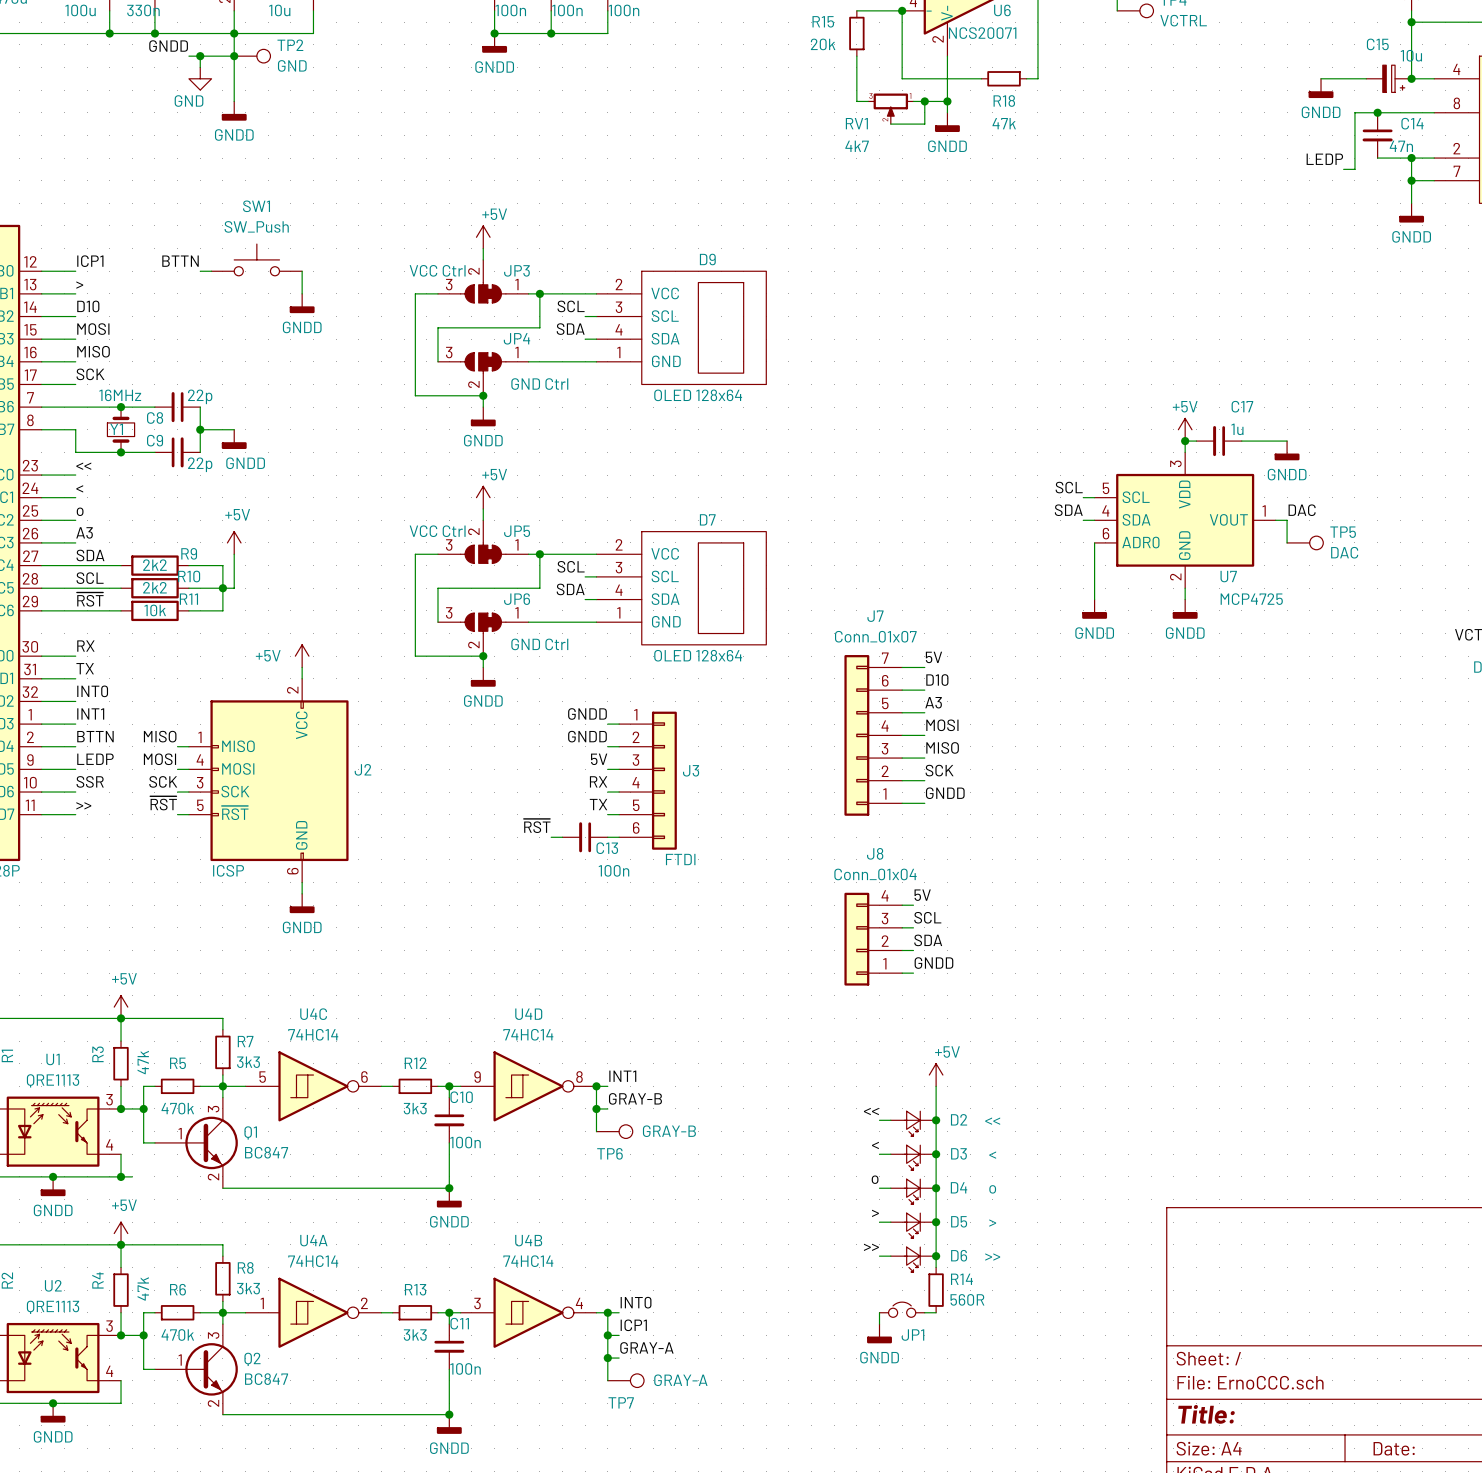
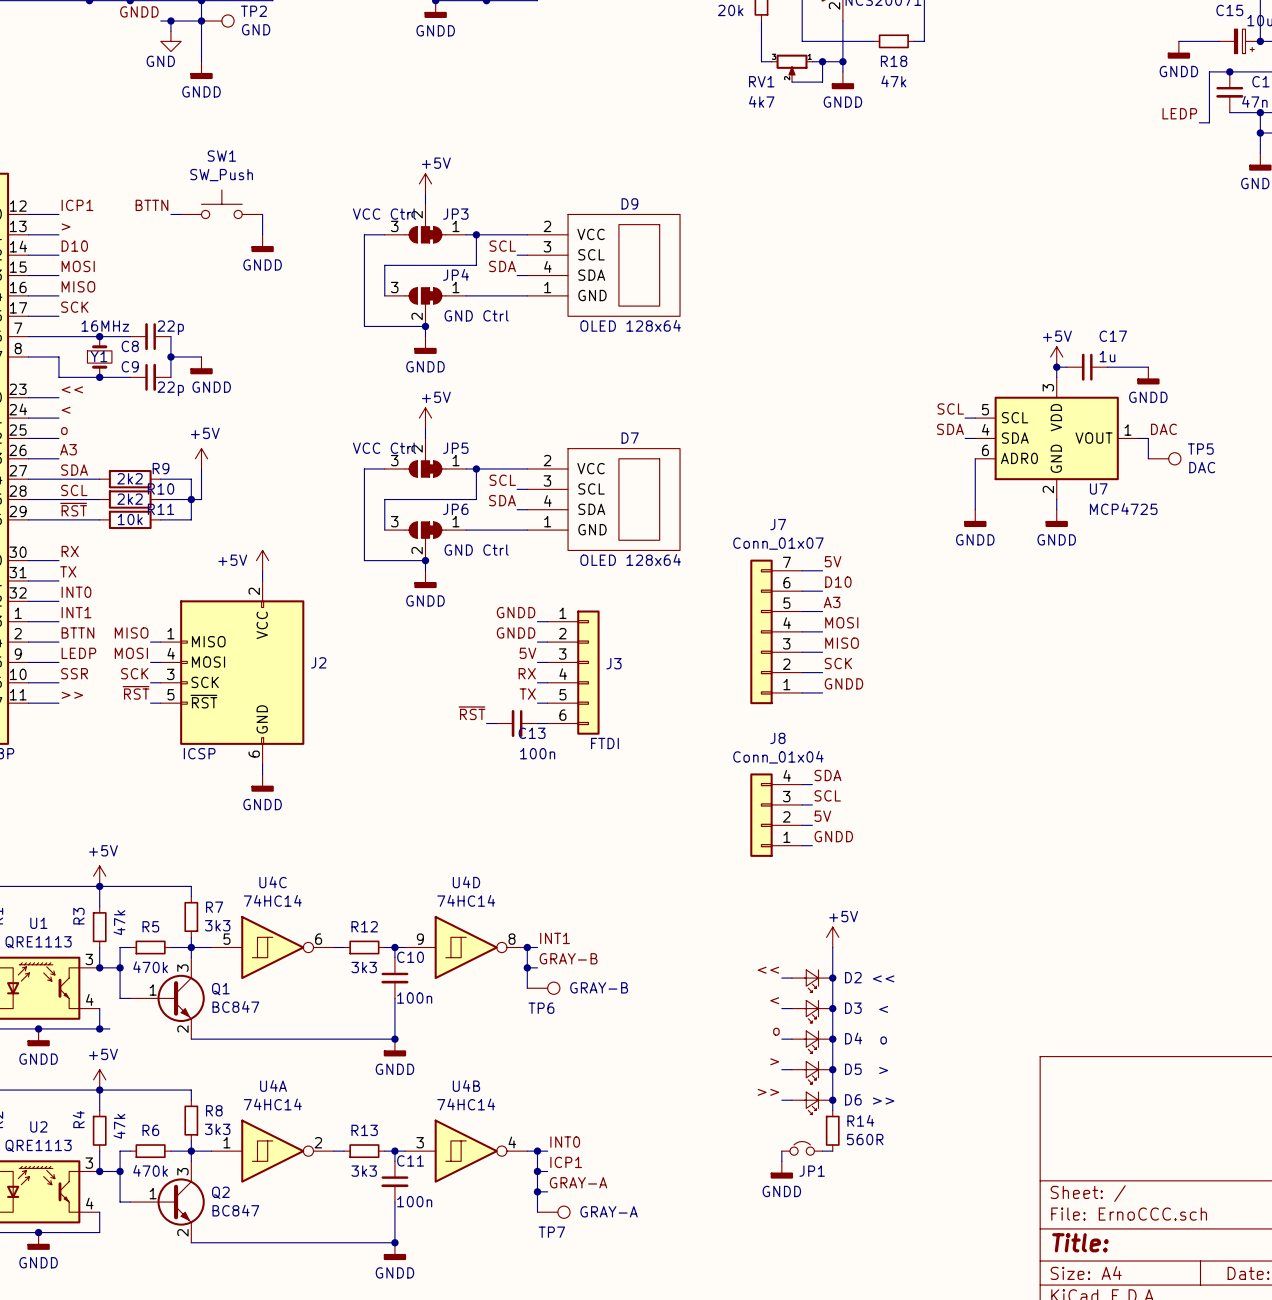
label: 5V (922, 895) -> SDA (827, 775)
label: SDA (928, 940) -> 5V (822, 816)

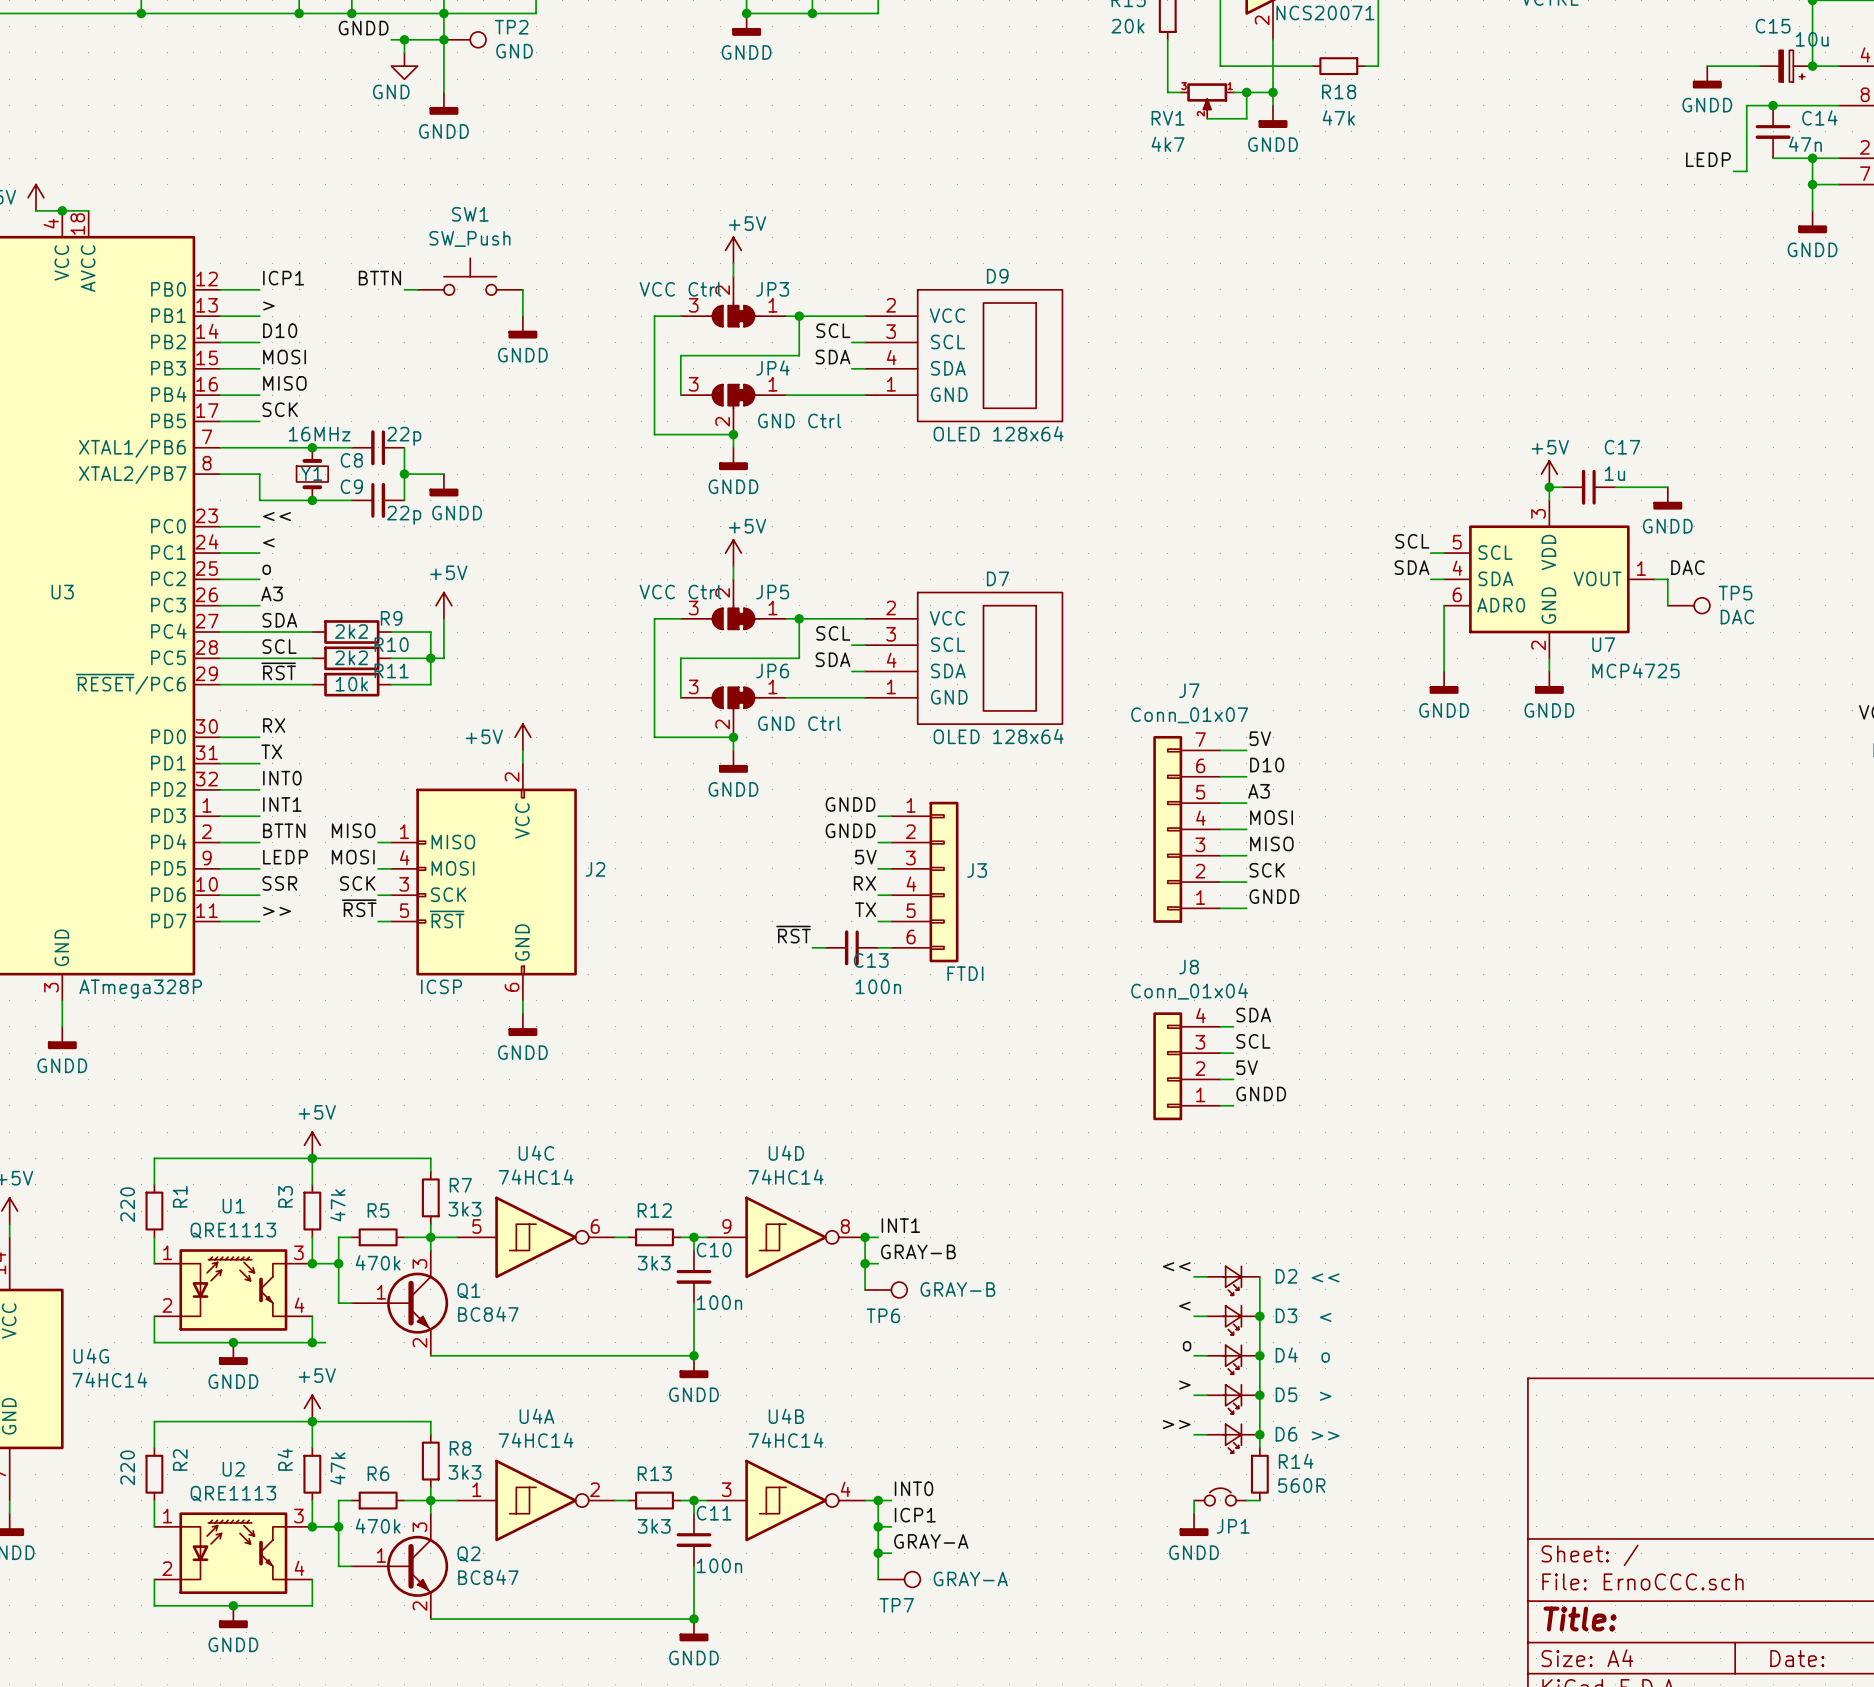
power symbol: +5V (832, 937) -> none
wire: (832, 947) (832, 978) -> none
junction: (832, 978) -> none

